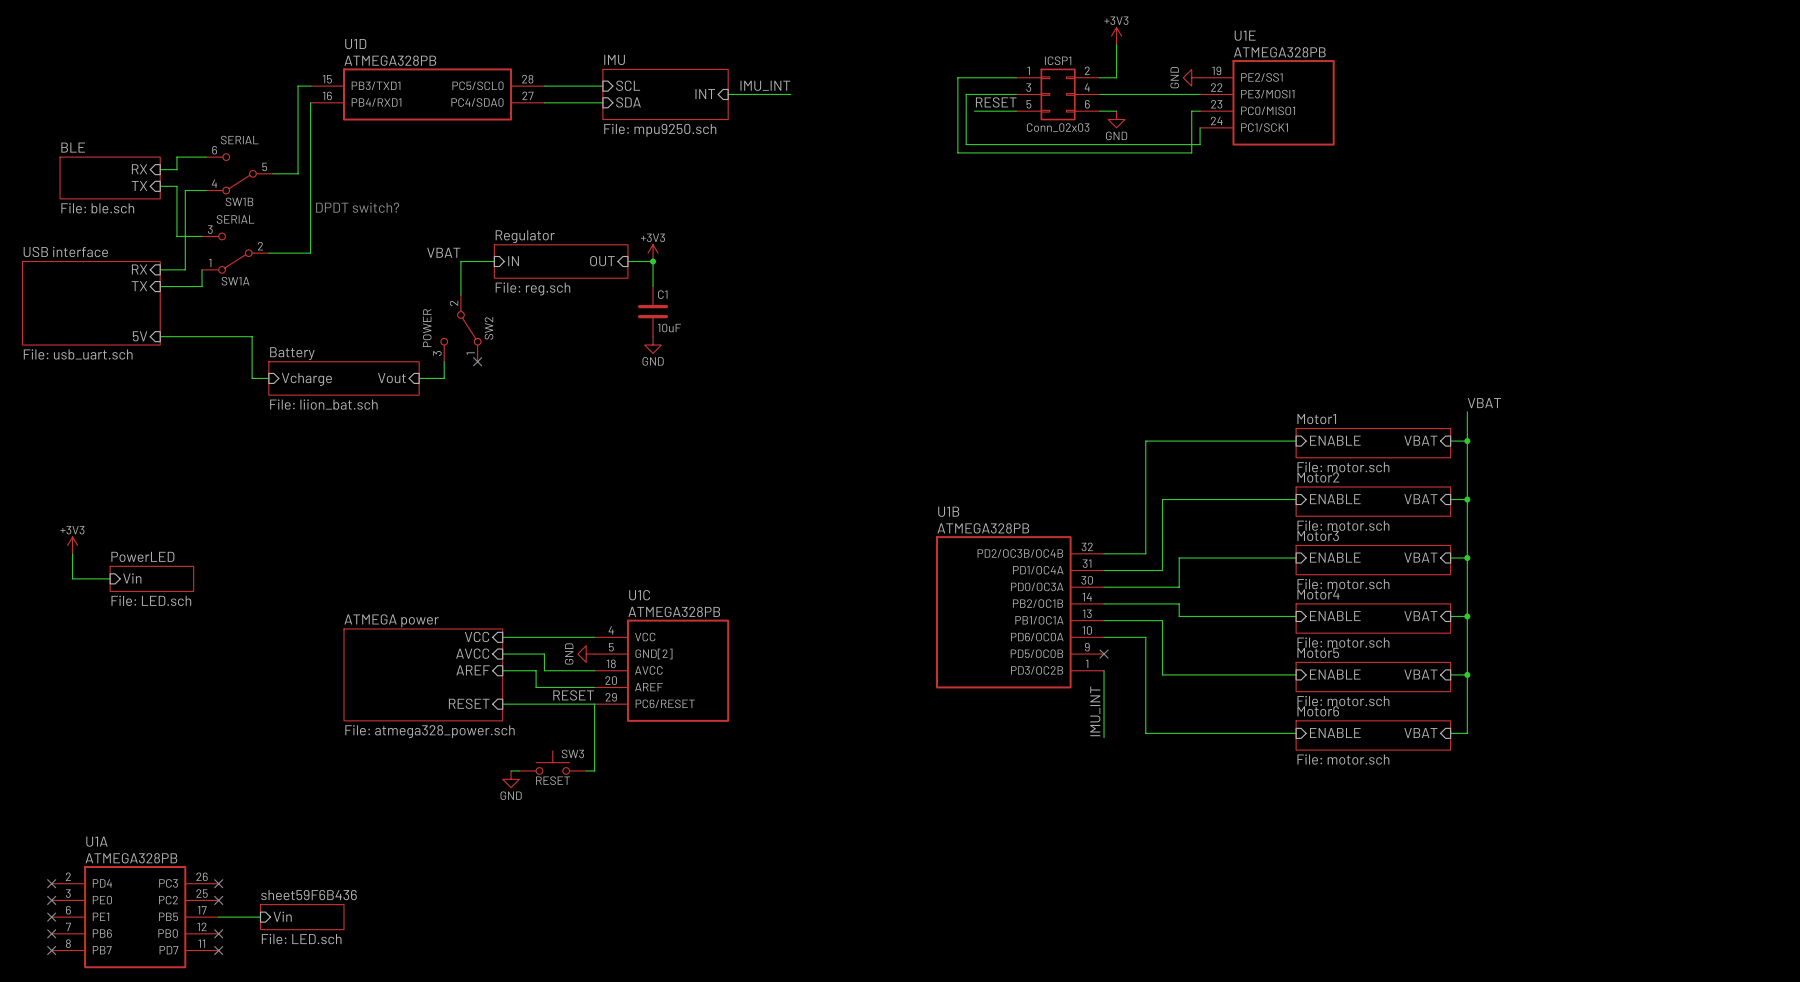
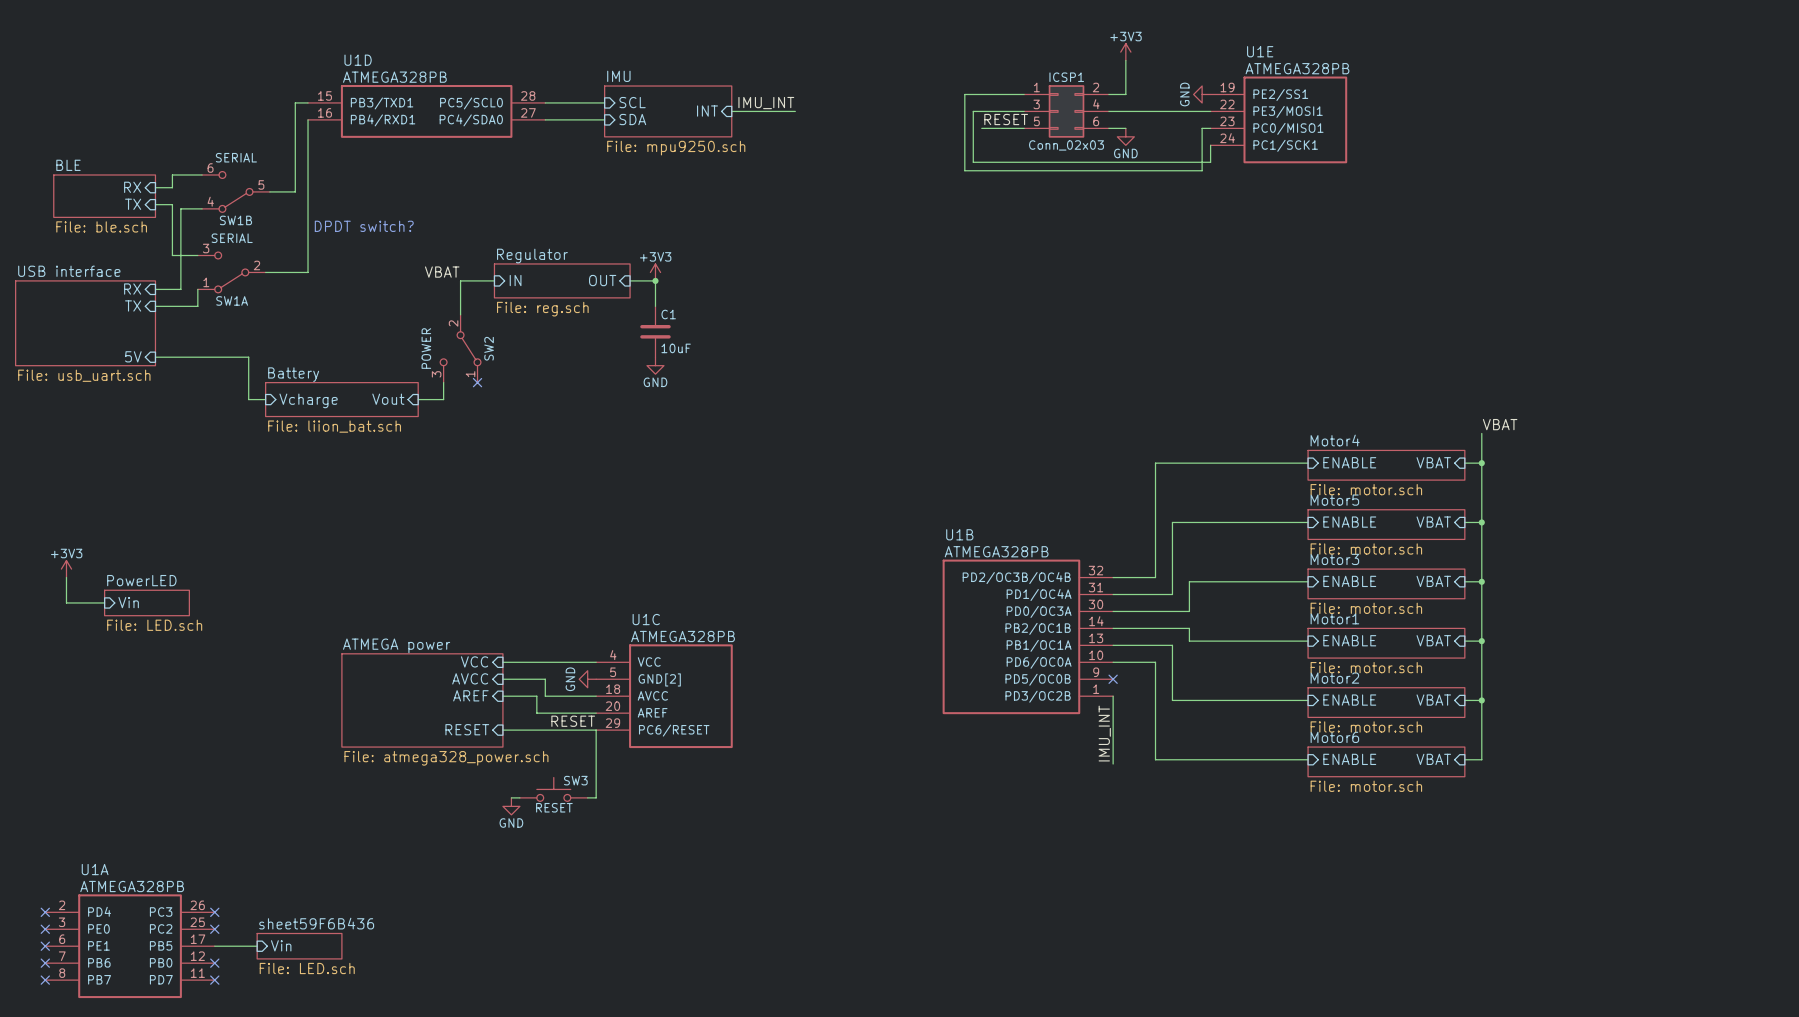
sheet Motor1 name: Motor1 (1316, 419) -> Motor4 (1335, 440)
sheet Motor2 name: Motor2 (1318, 477) -> Motor5 (1334, 500)
sheet Motor4 name: Motor4 (1318, 594) -> Motor1 (1334, 618)
sheet Motor5 name: Motor5 (1318, 652) -> Motor2 (1334, 678)

